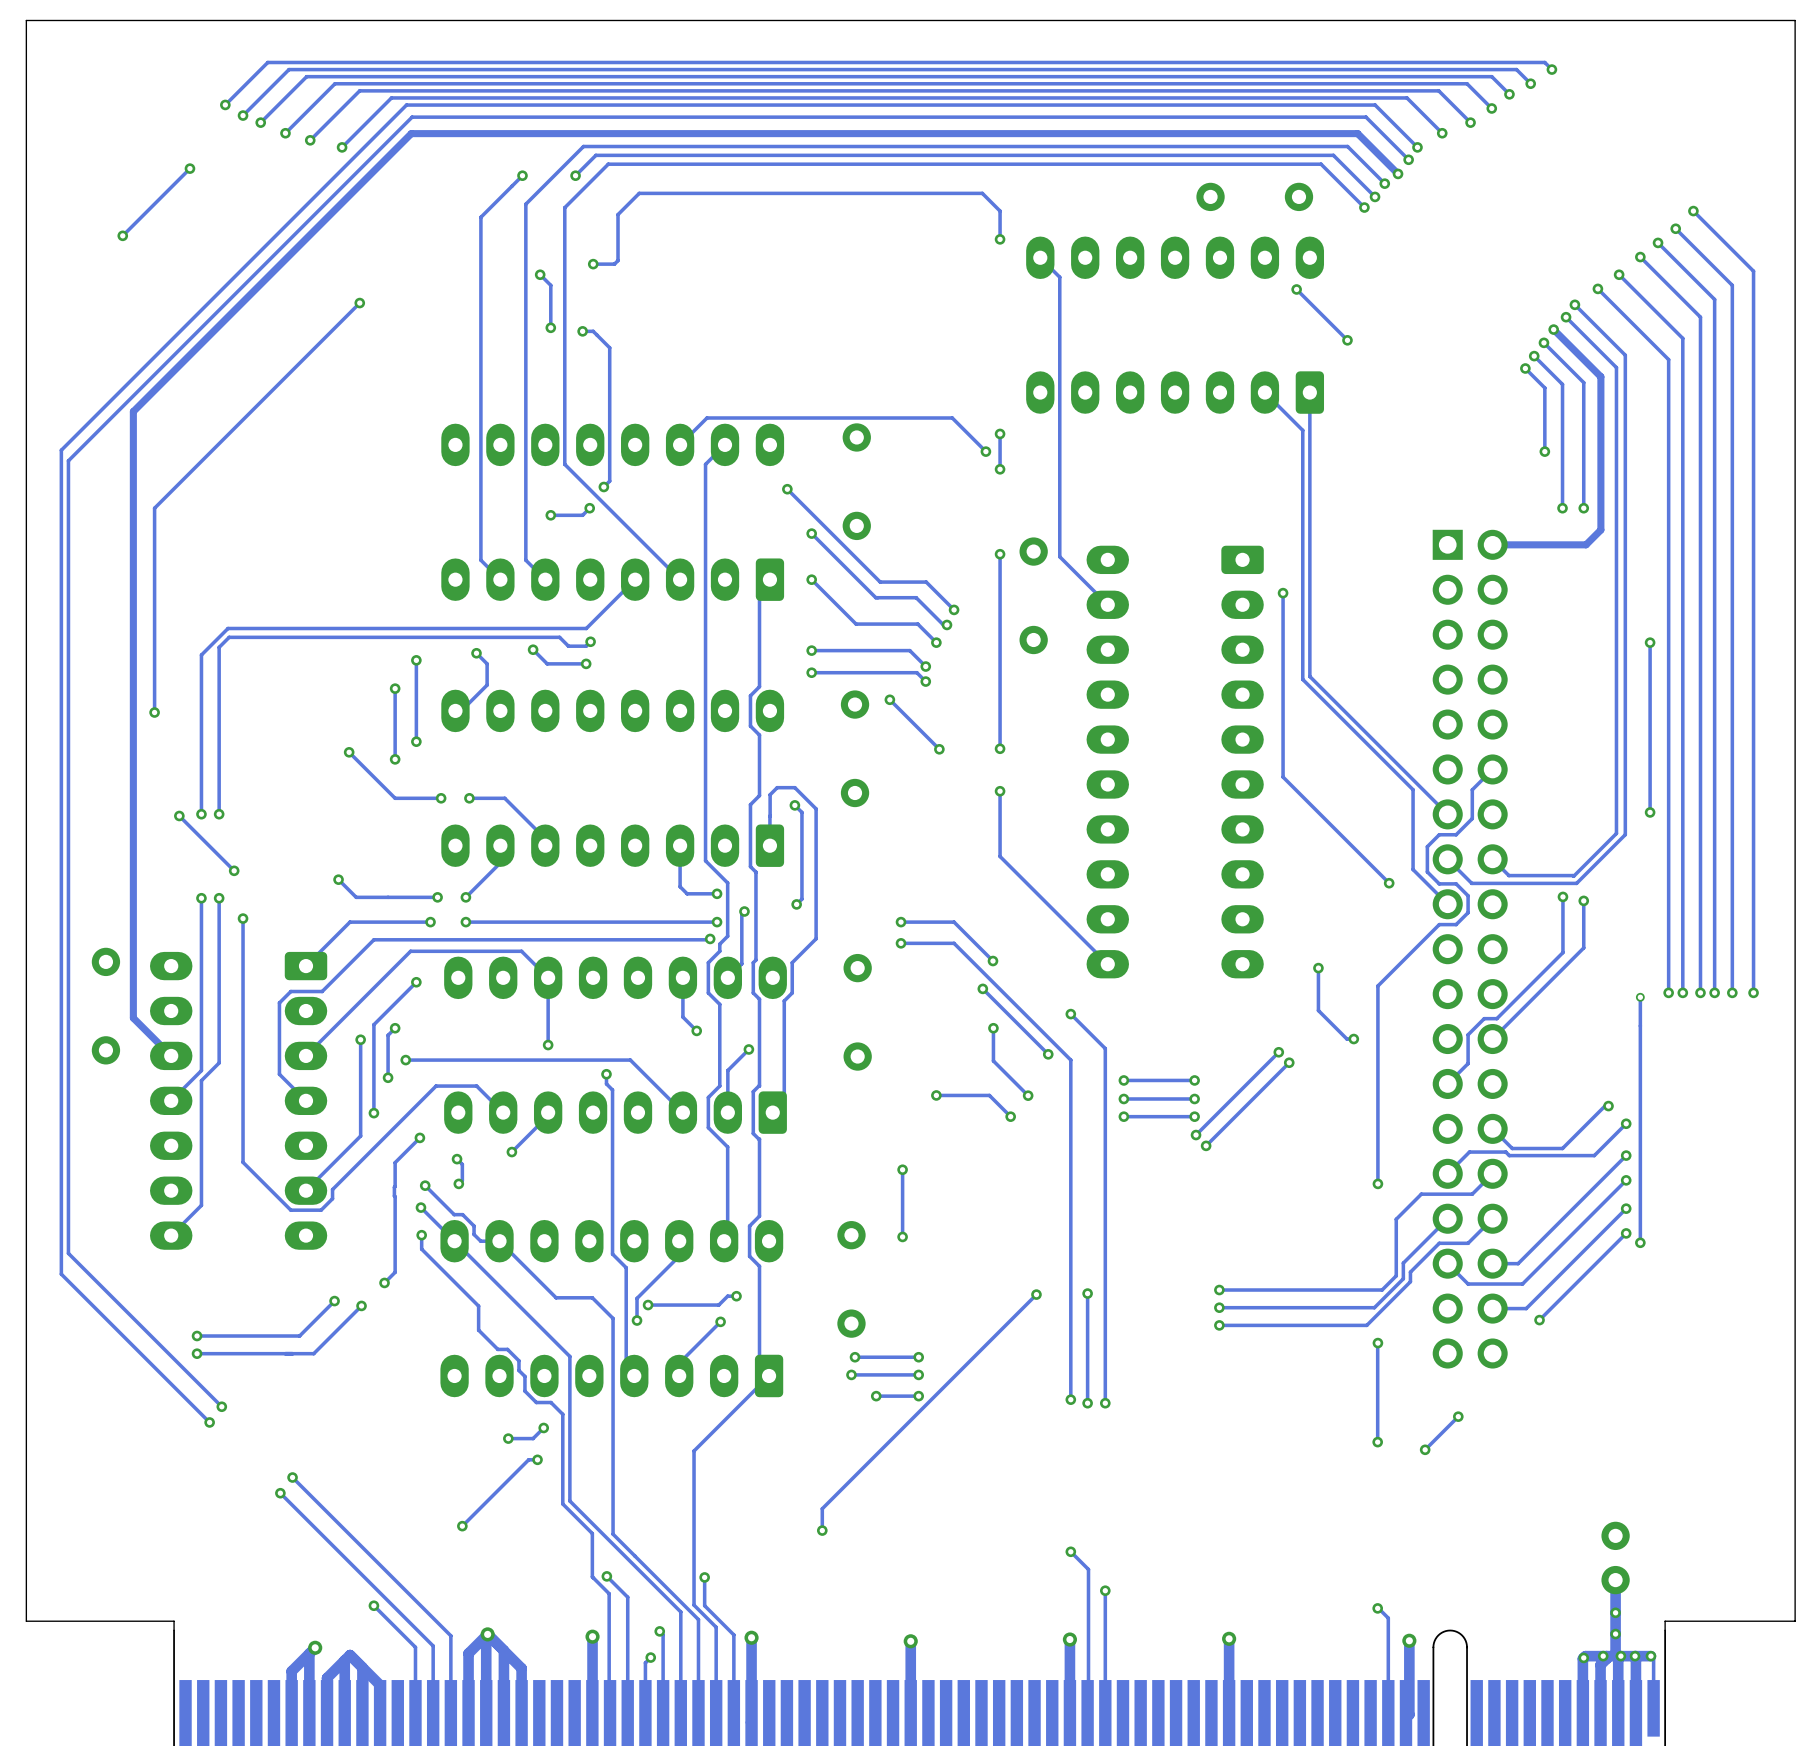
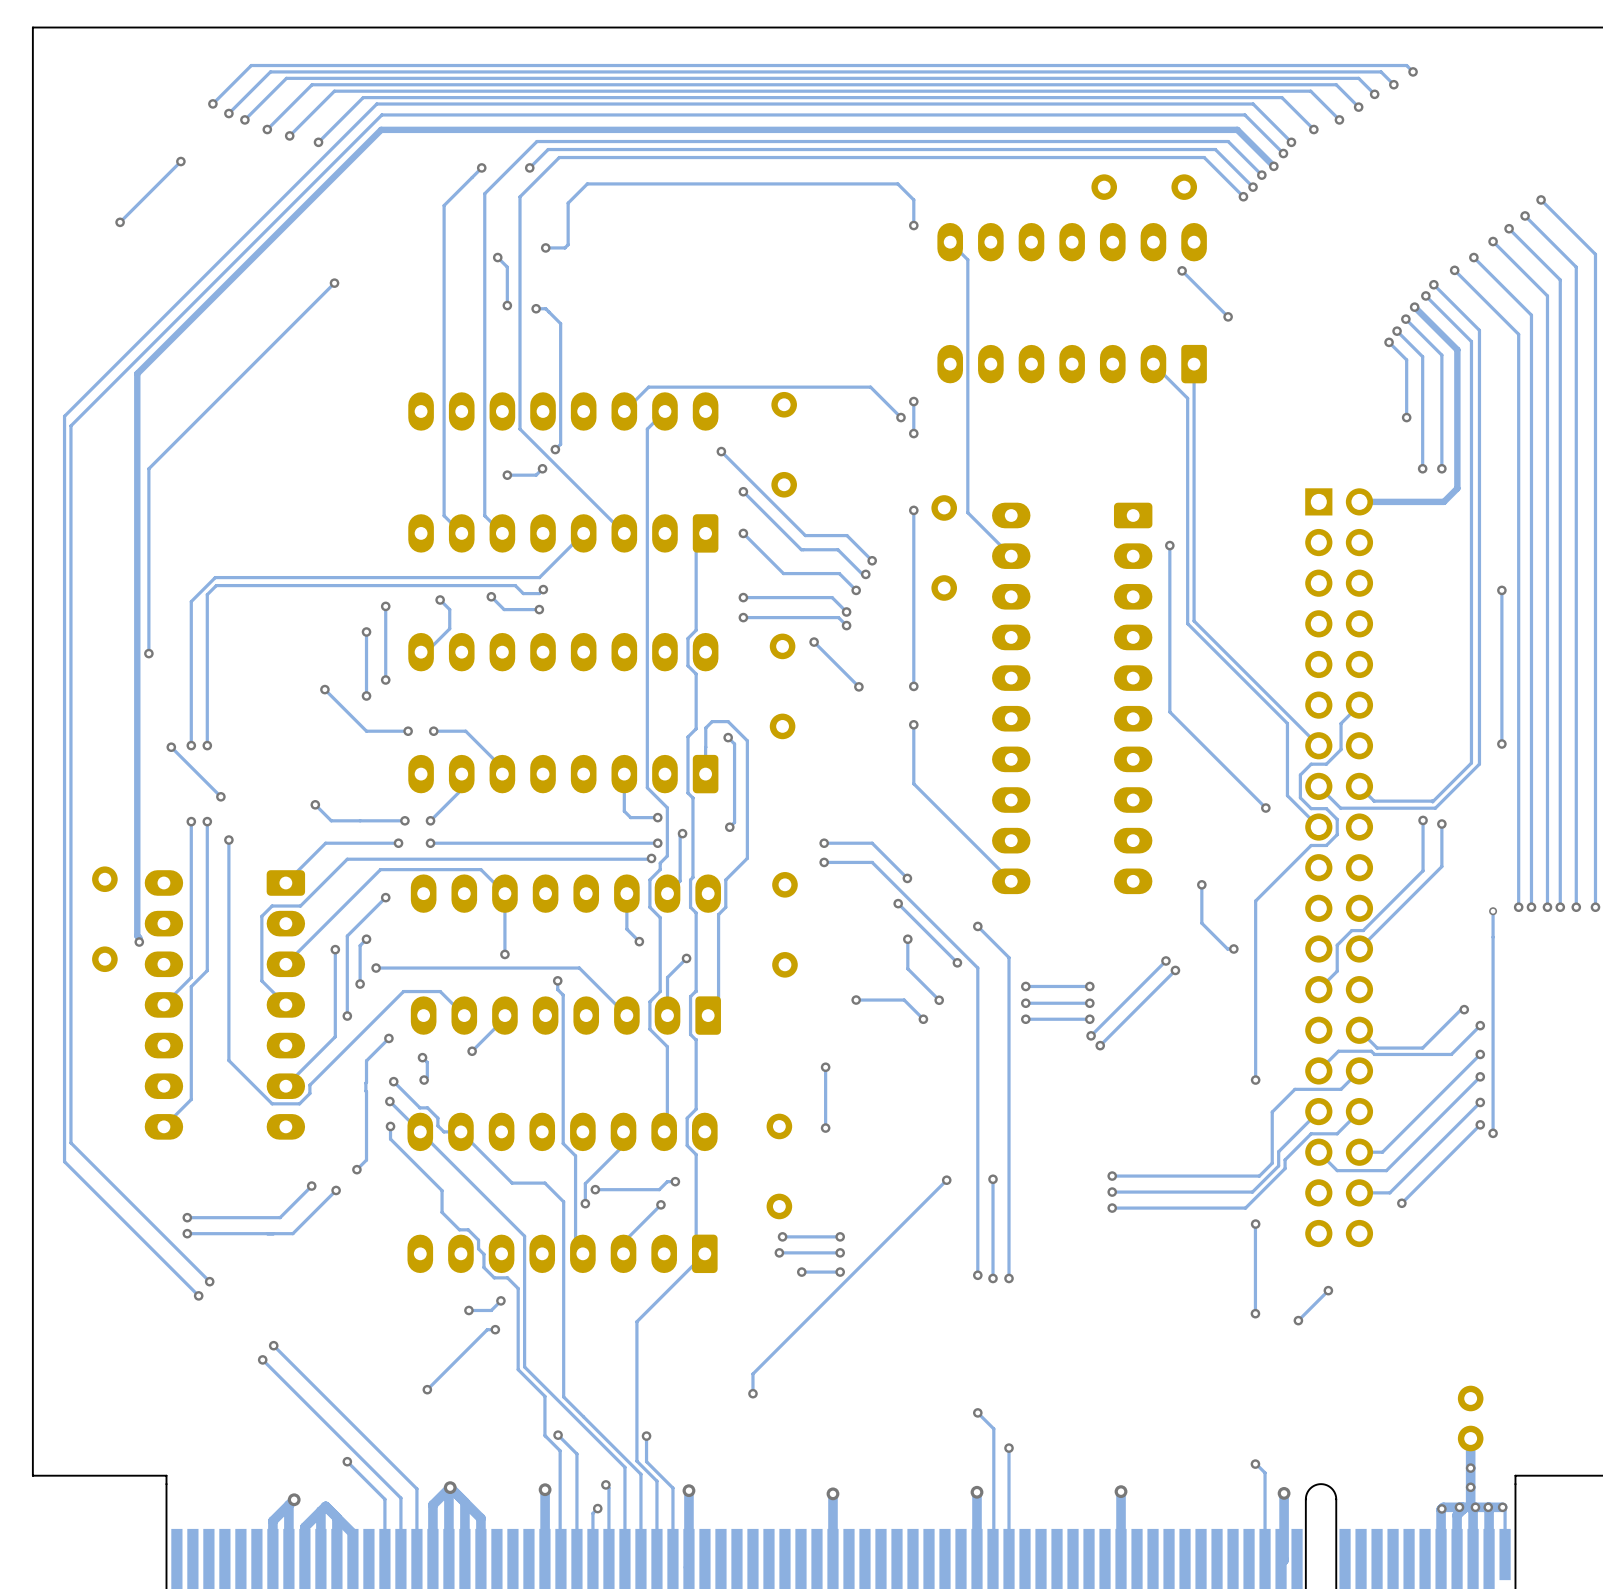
track: (141, 403) (133, 411) (133, 1018) (171, 1055) -> (137, 373) (137, 935) (139, 942)
via: none -> (139, 942)

